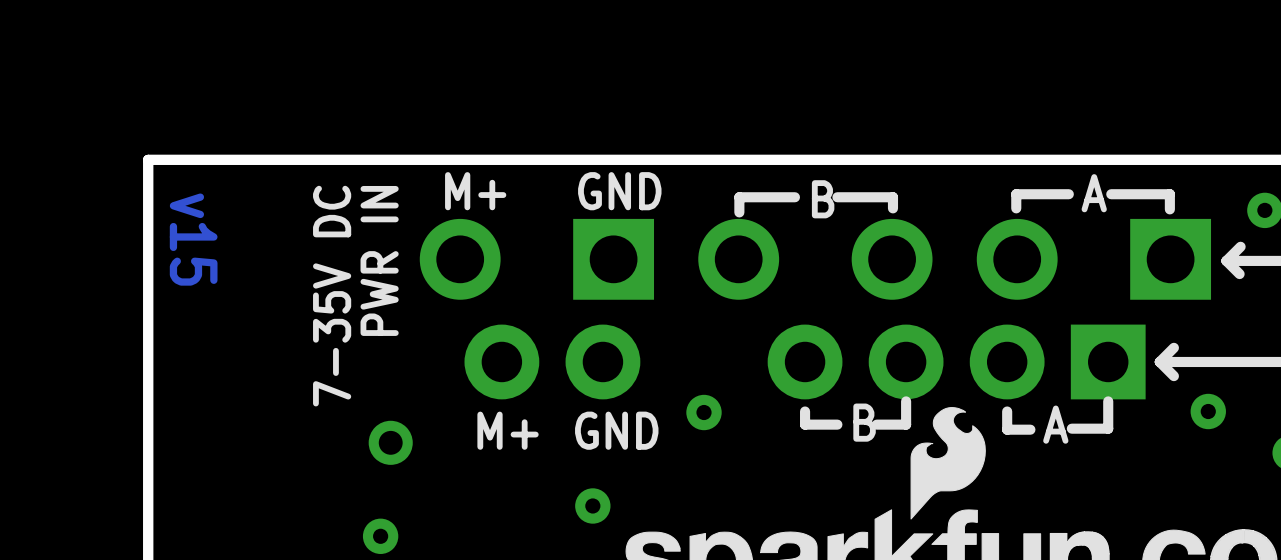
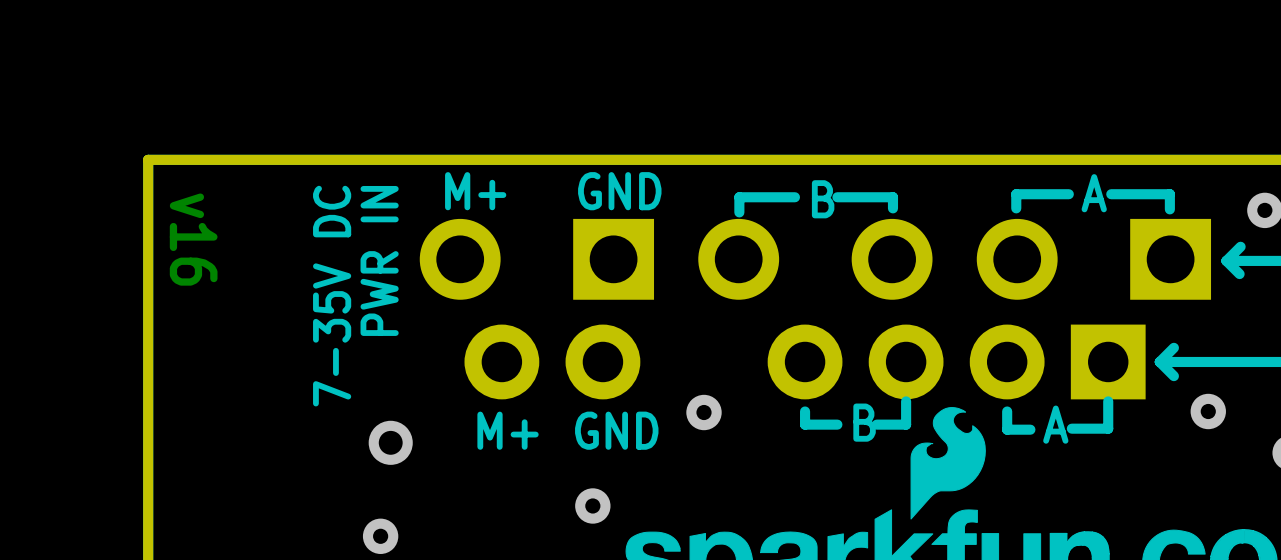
text: v15 (193, 239) -> v16 (193, 239)

